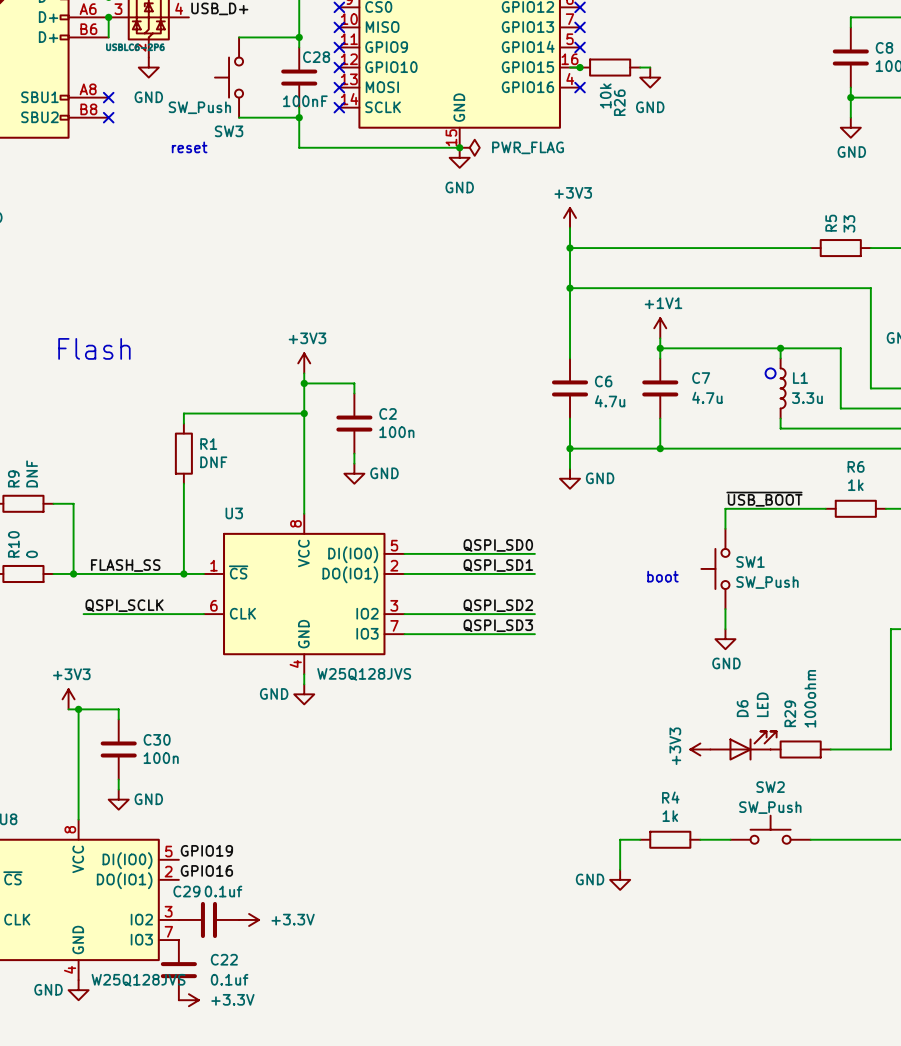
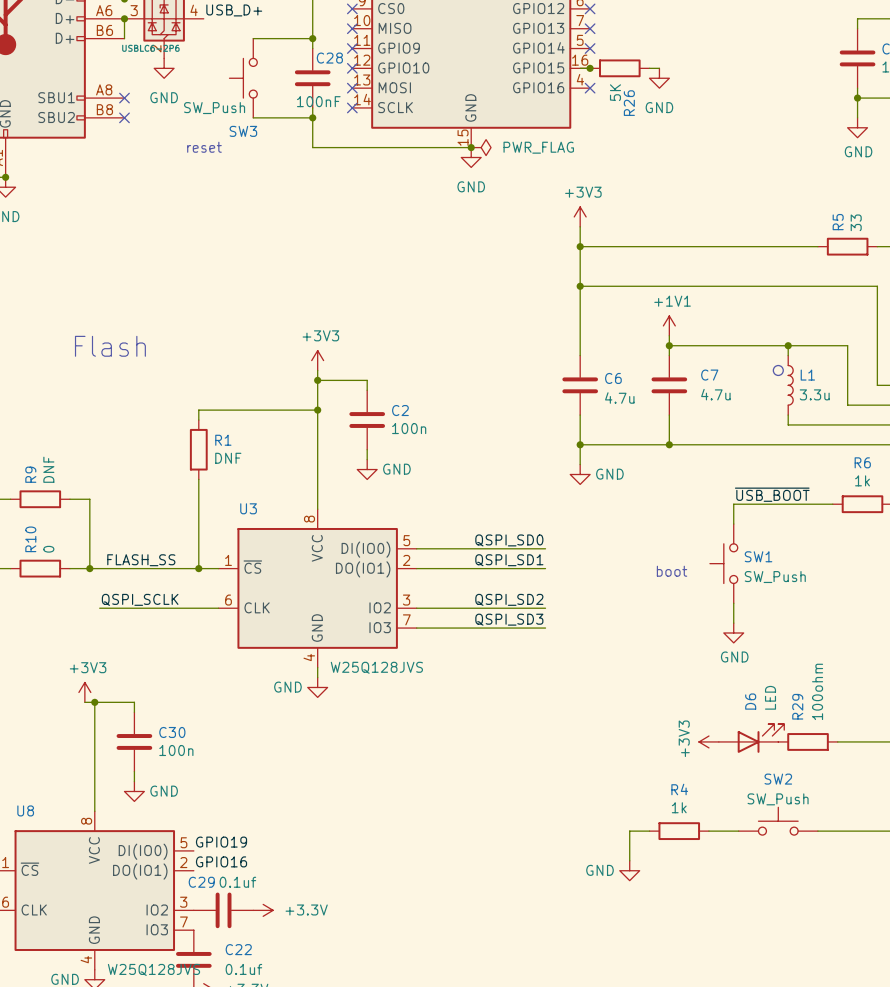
R26 value: 10k (605, 95) -> 5K (615, 92)

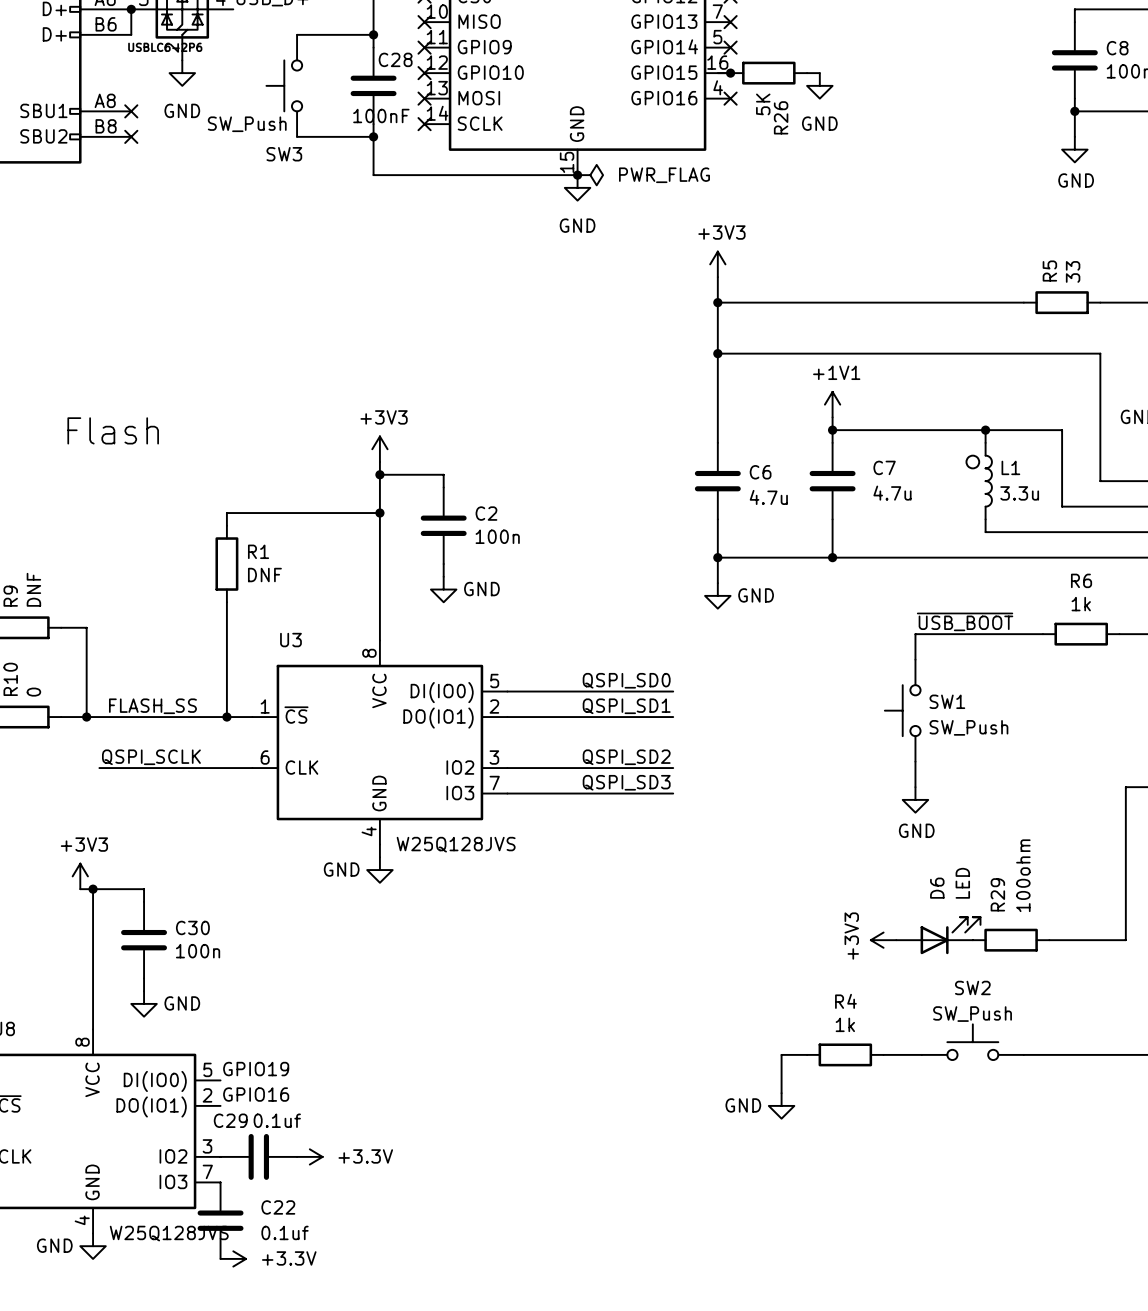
text: reset (204, 147) -> none
text: boot (672, 571) -> none

